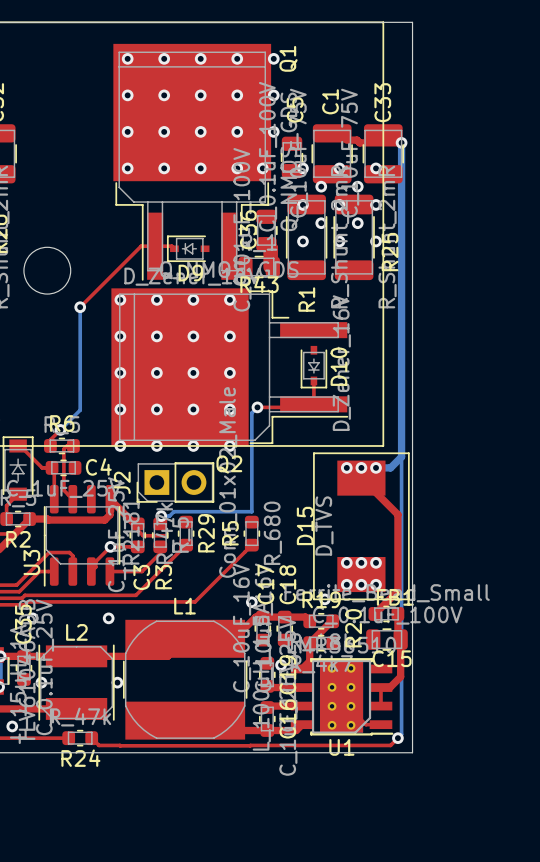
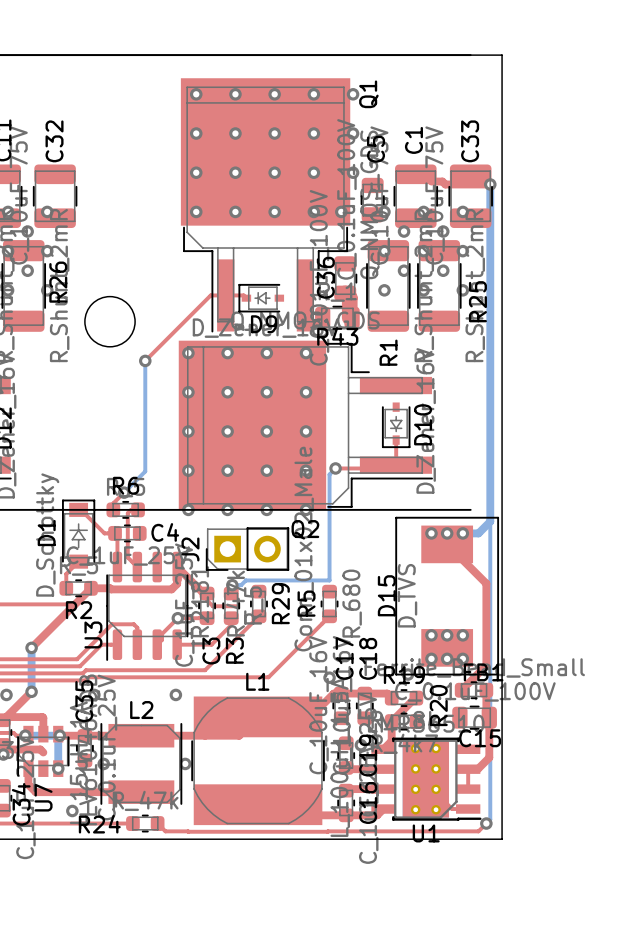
line: (383, 22) (383, 445) -> none
R24 name position: R24 (80, 758) -> R24 (99, 824)

